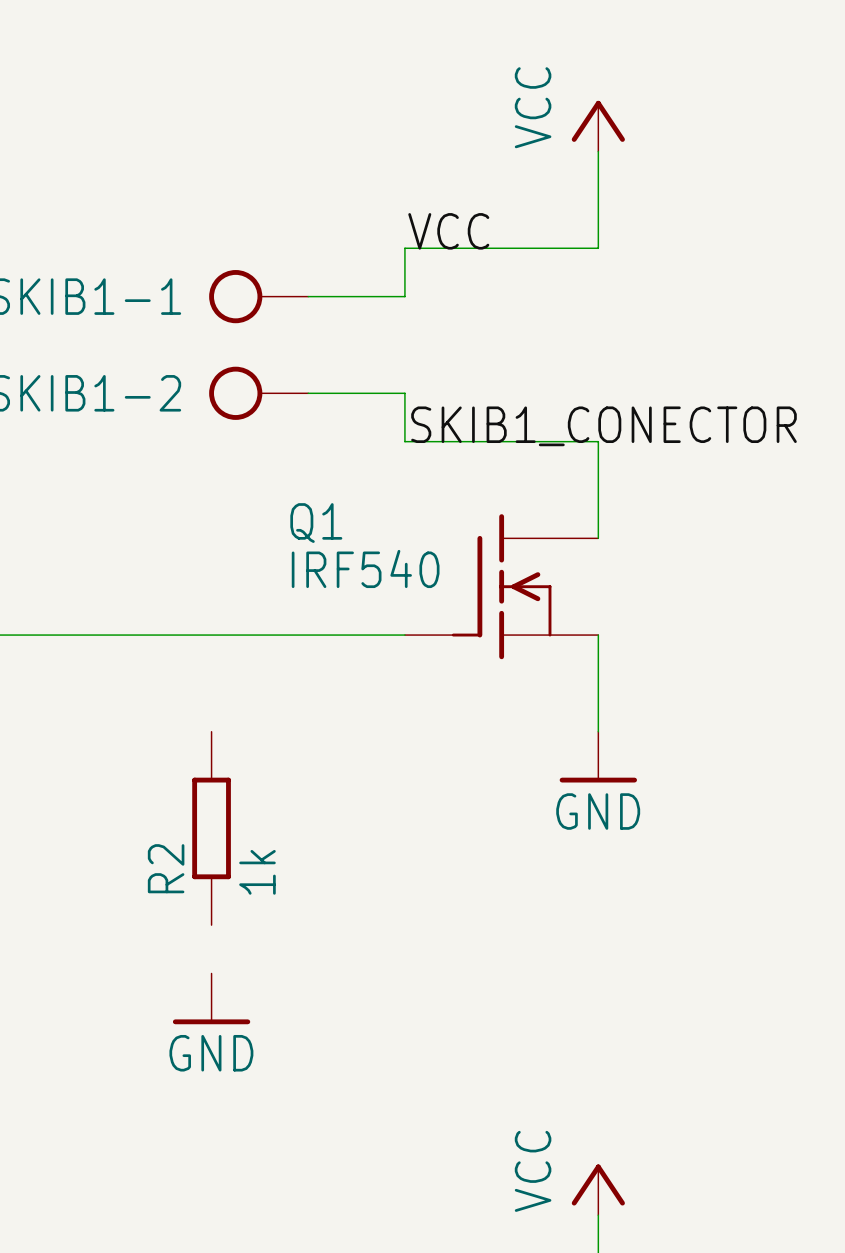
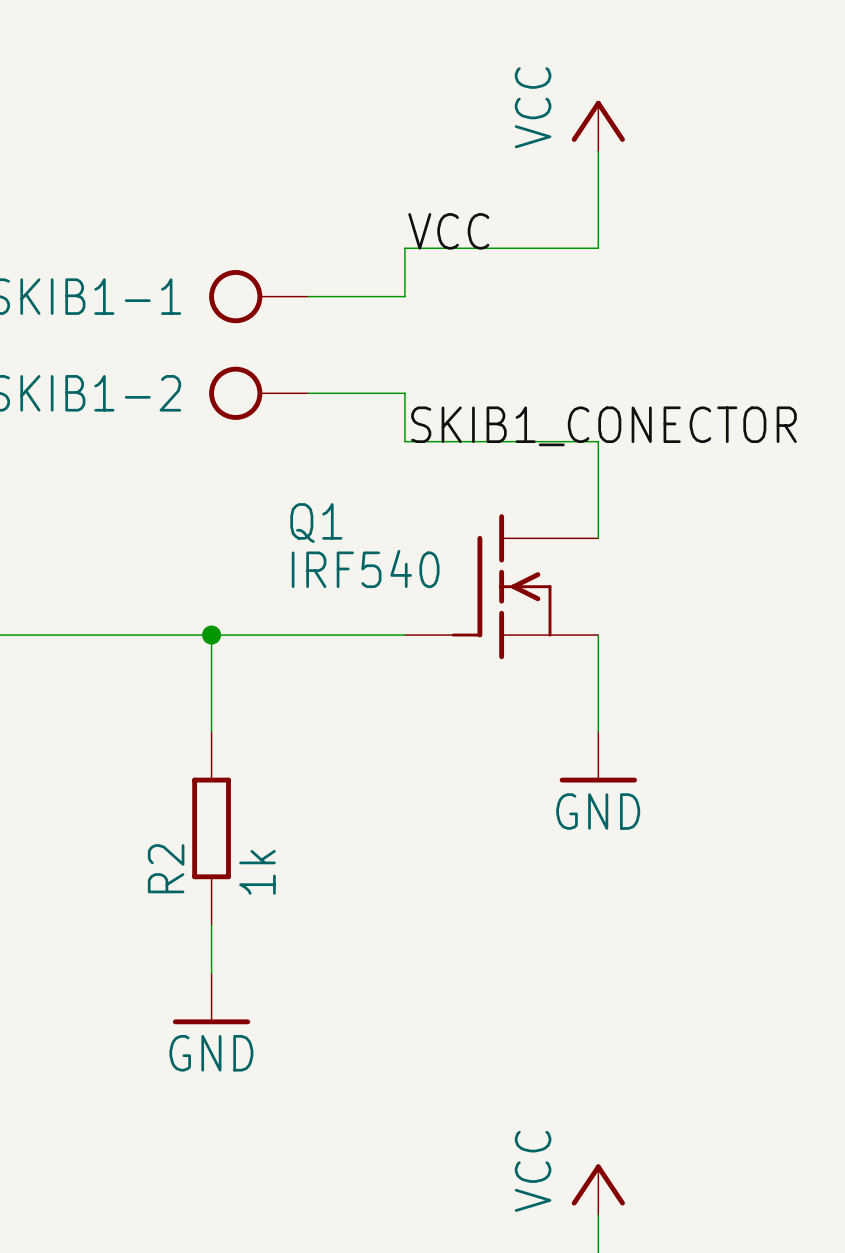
wire: none -> (211, 635) (211, 731)
junction: none -> (211, 635)
wire: none -> (211, 925) (211, 973)

